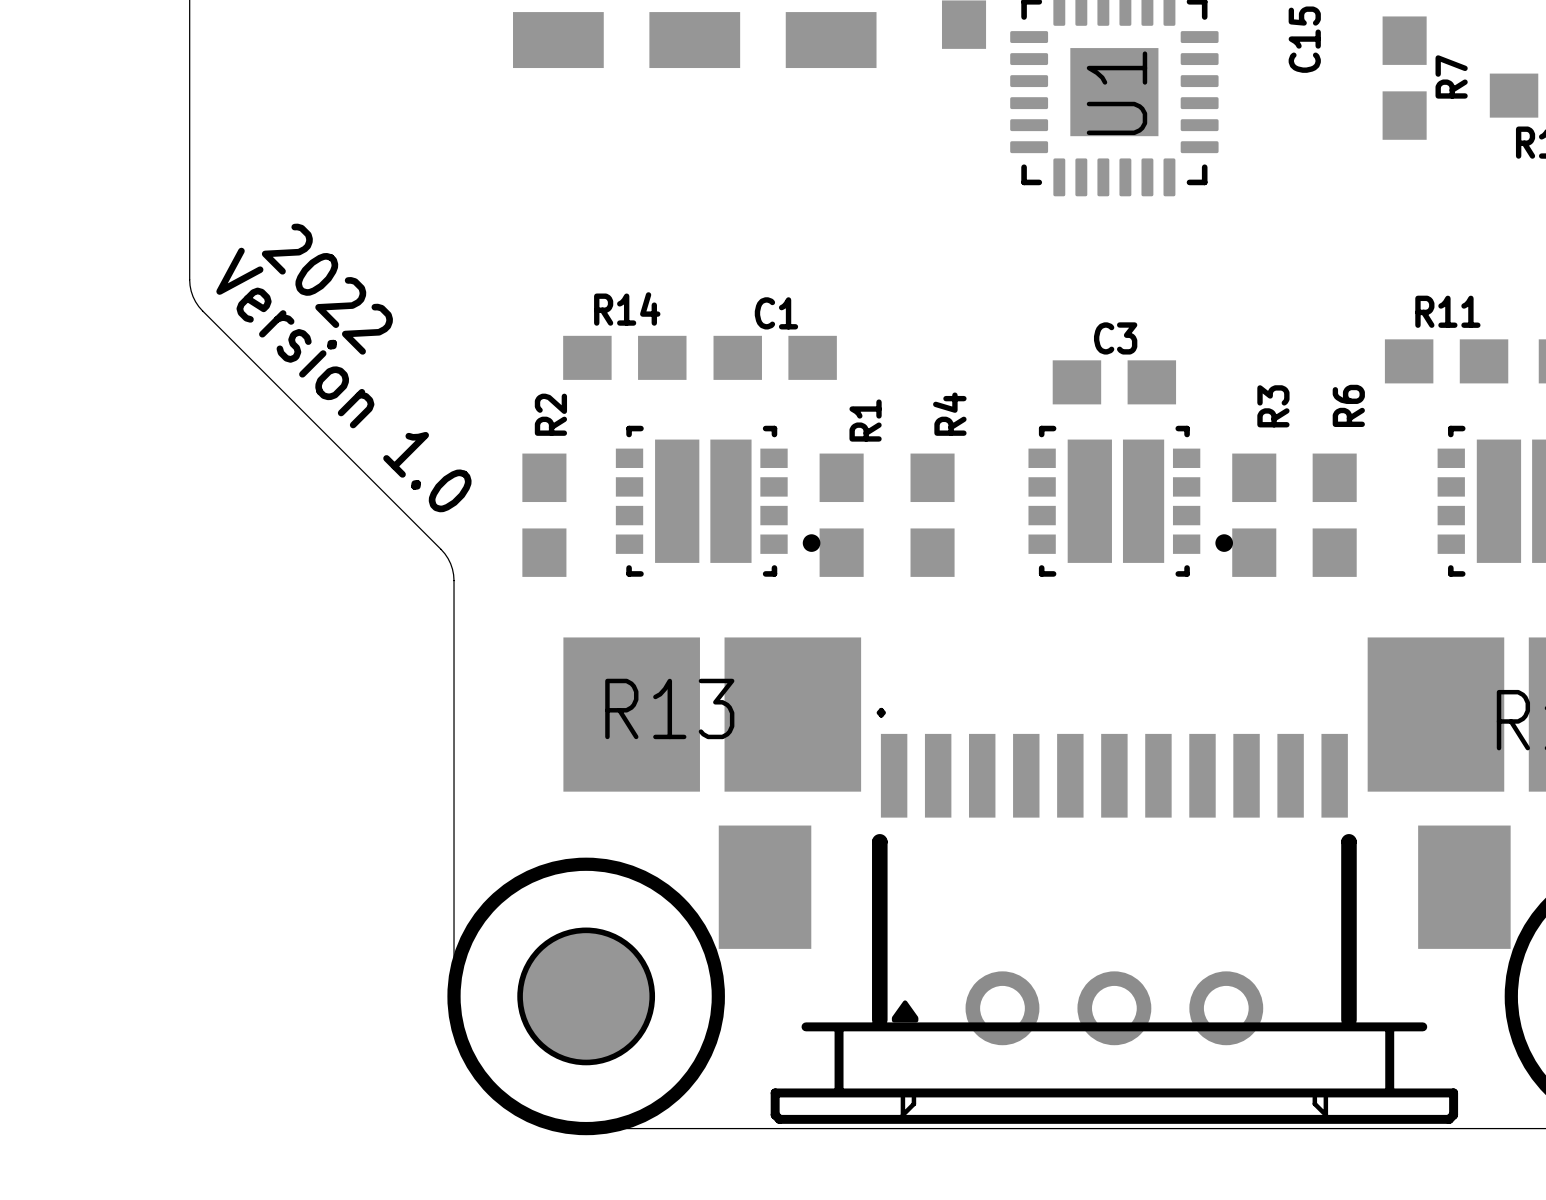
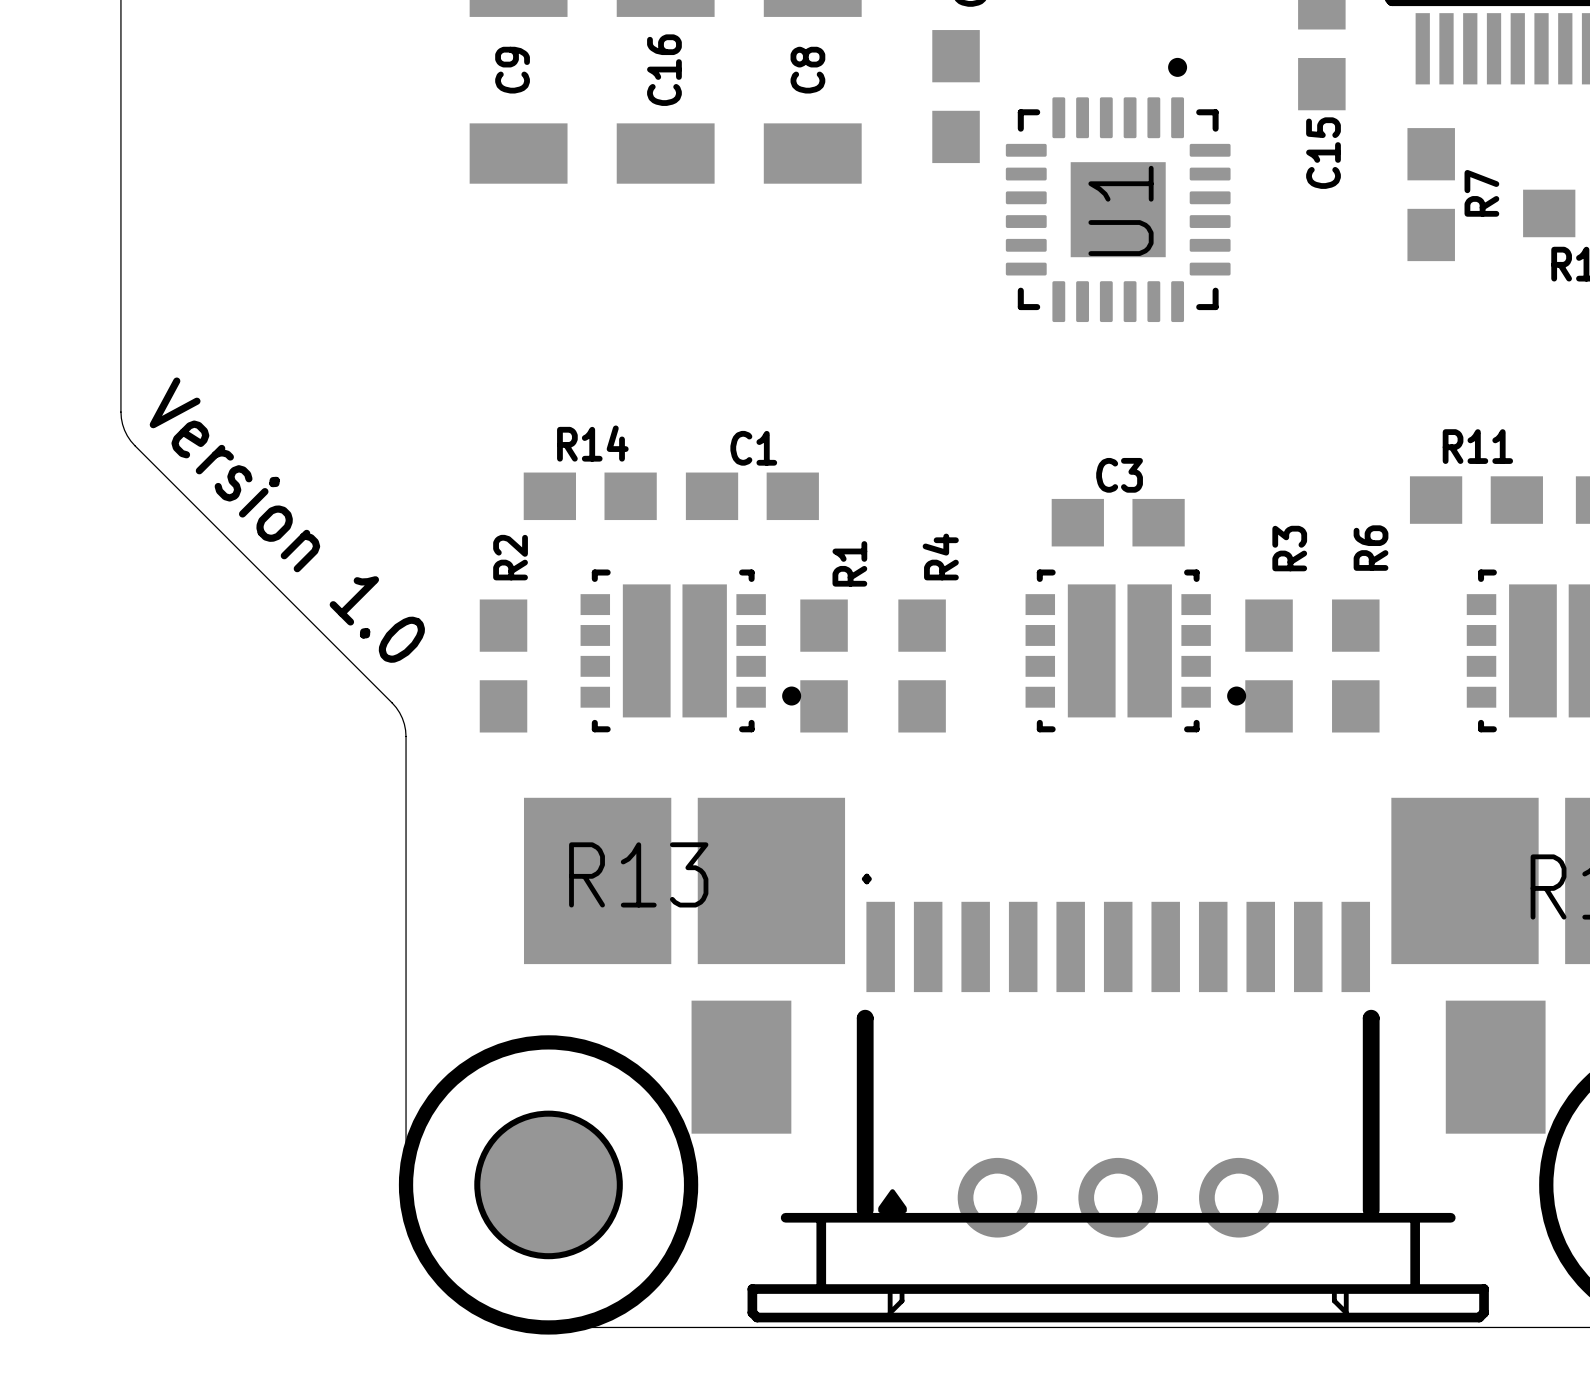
text: 2022 (327, 289) -> none

